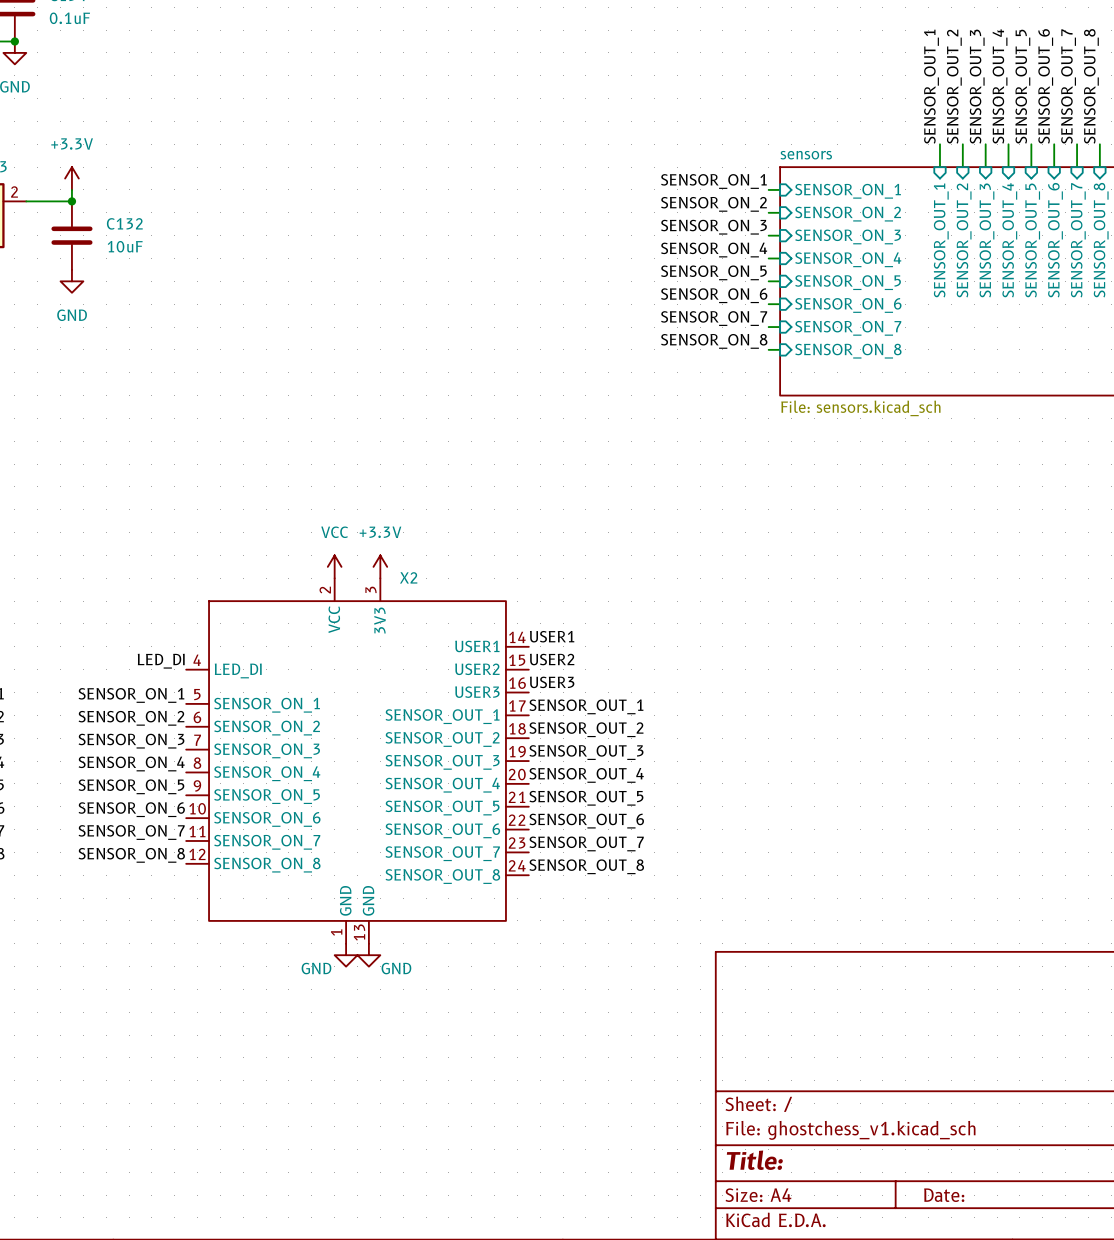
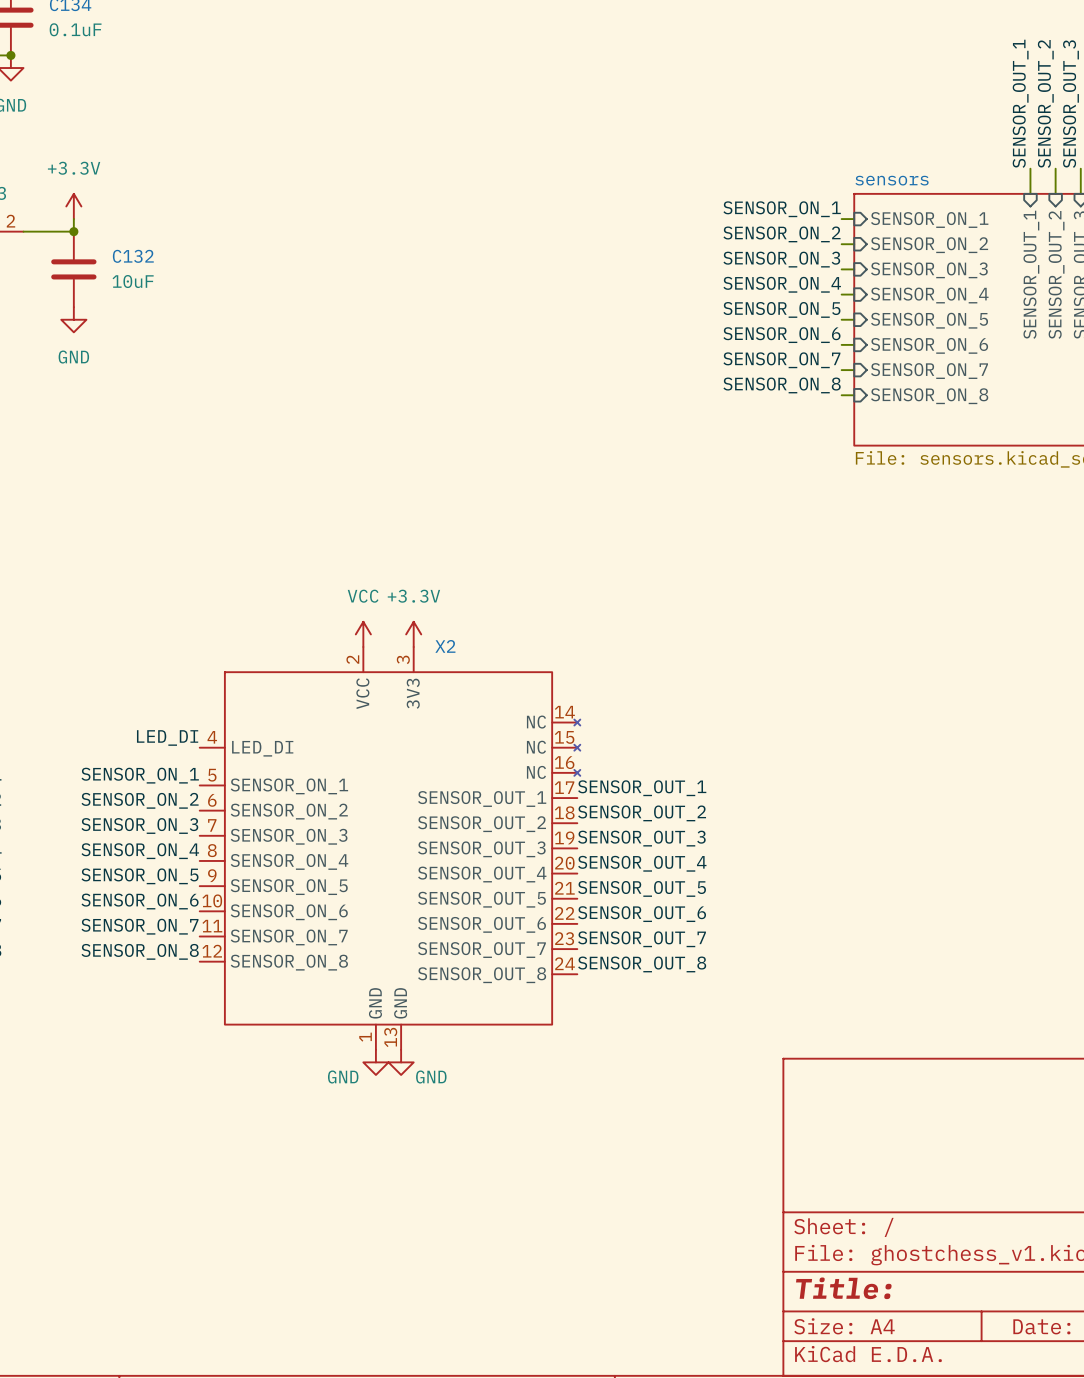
X2 symbol: [186, 578, 529, 944] -> [199, 647, 581, 1050]
label: USER1 (552, 636) -> none
label: USER2 (552, 659) -> none
label: USER3 (552, 682) -> none

